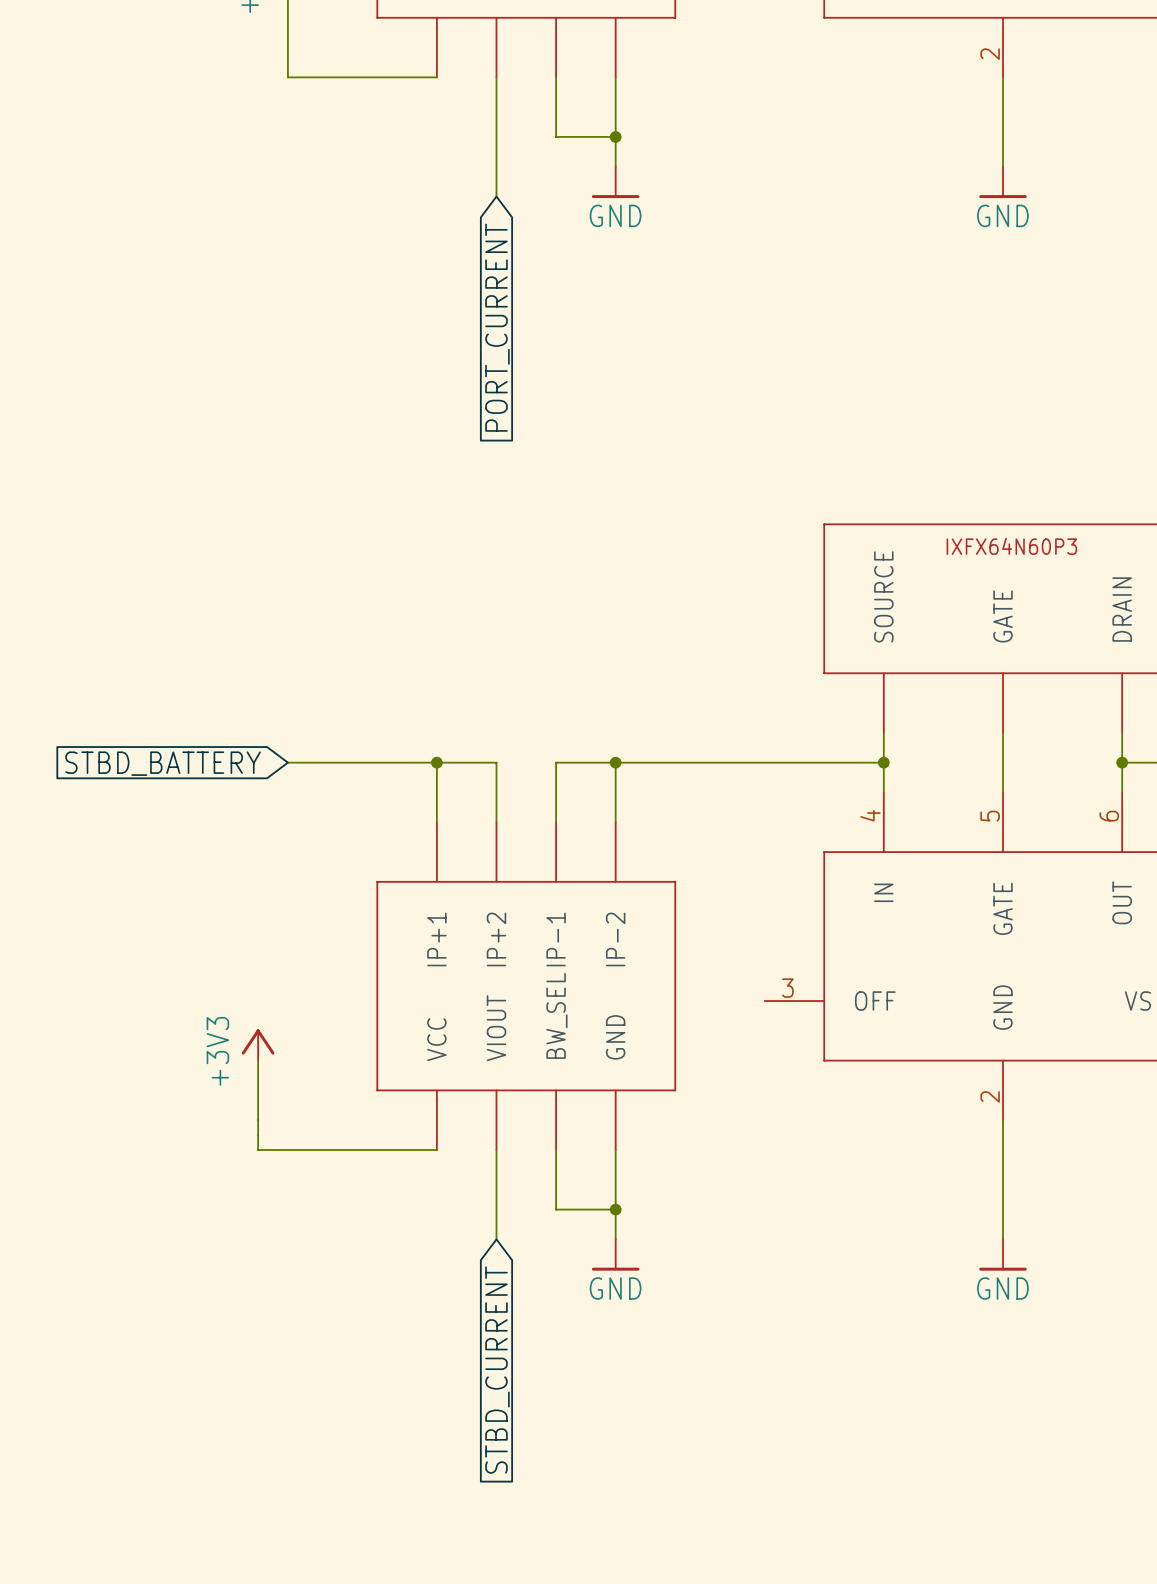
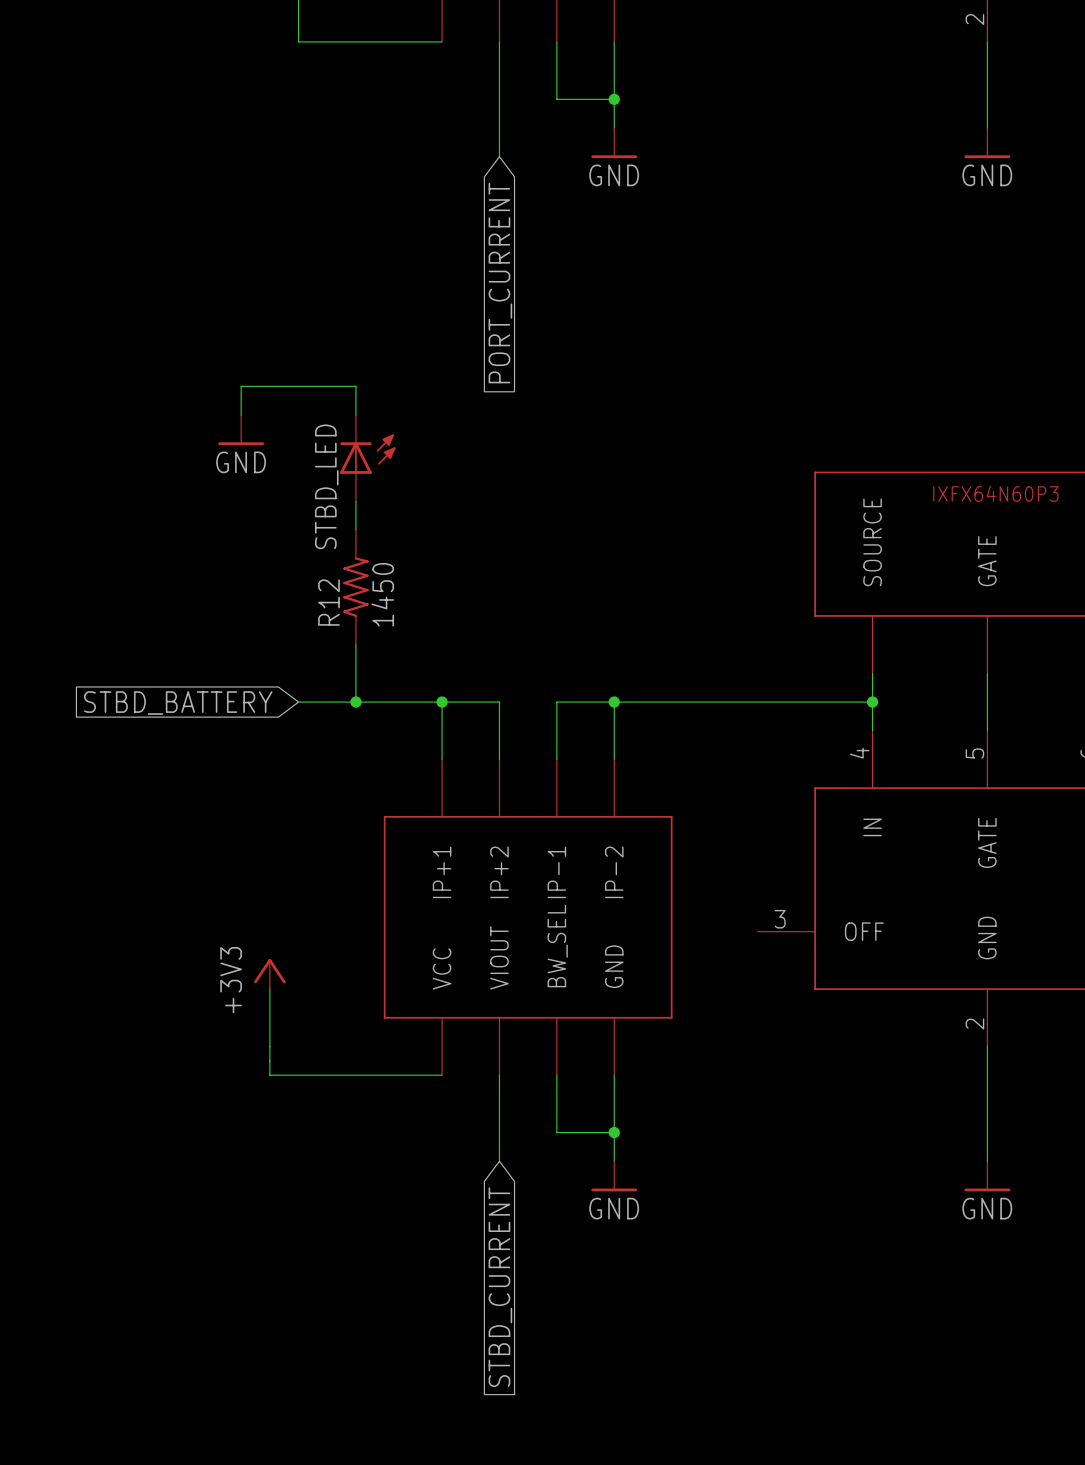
wire: none -> (241, 415) (241, 386) (355, 386) (355, 415)
power symbol: none -> GND (241, 430)
STBD_LED: none -> (367, 458)
wire: none -> (355, 501) (355, 529)
R12: none -> 1450 (355, 587)
wire: none -> (355, 644) (355, 702)
junction: none -> (355, 702)

